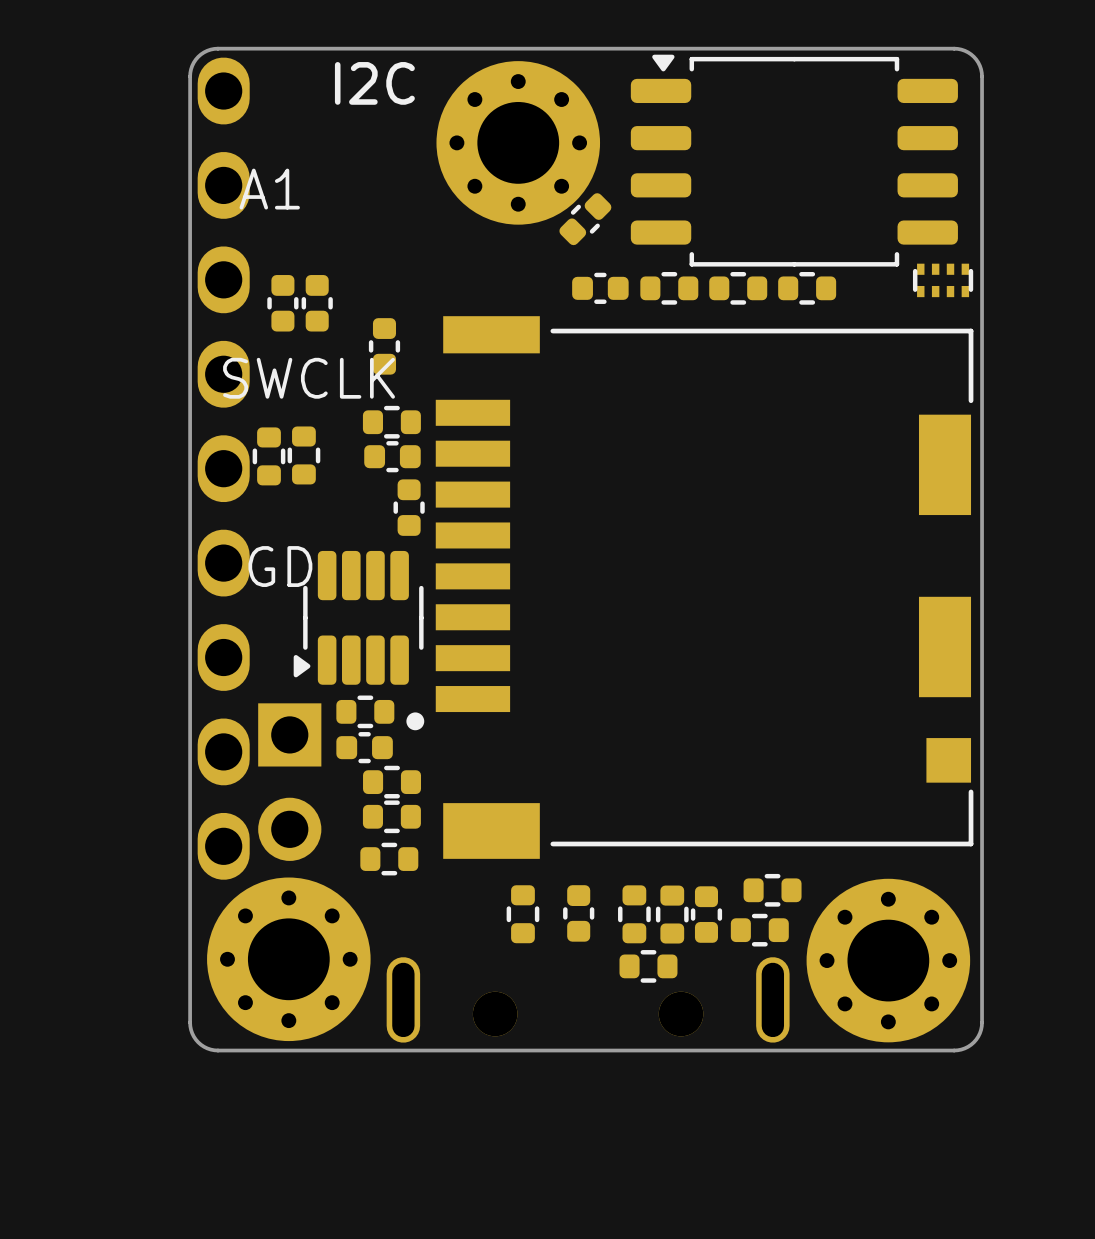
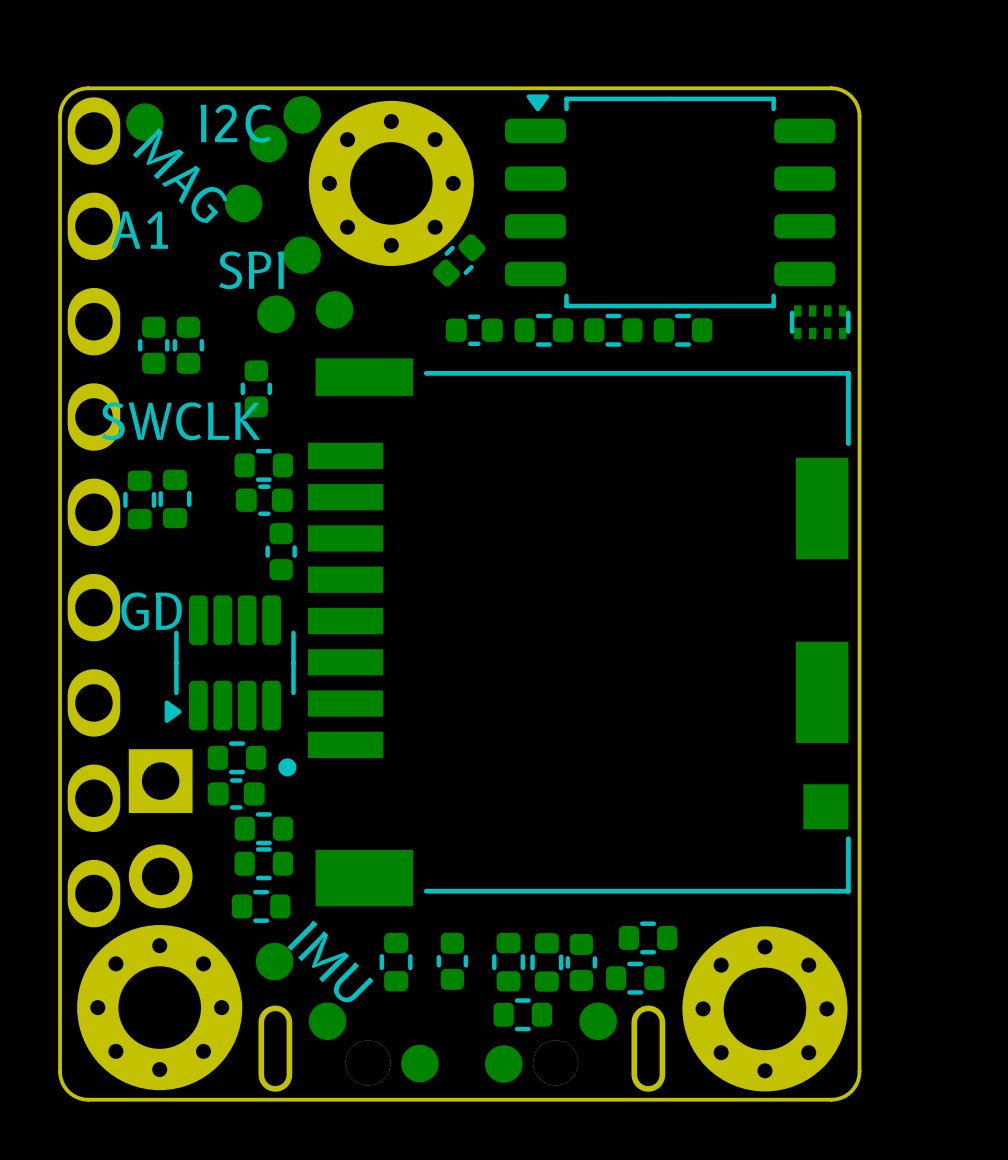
part: none -> (302, 114)
MAG: none -> (145, 122)
part: none -> (268, 143)
part: none -> (243, 203)
part: none -> (302, 255)
part: none -> (334, 309)
SPI: none -> (275, 314)
part: none -> (274, 961)
IMU: none -> (327, 1021)
part: none -> (598, 1021)
part: none -> (419, 1063)
part: none -> (503, 1064)

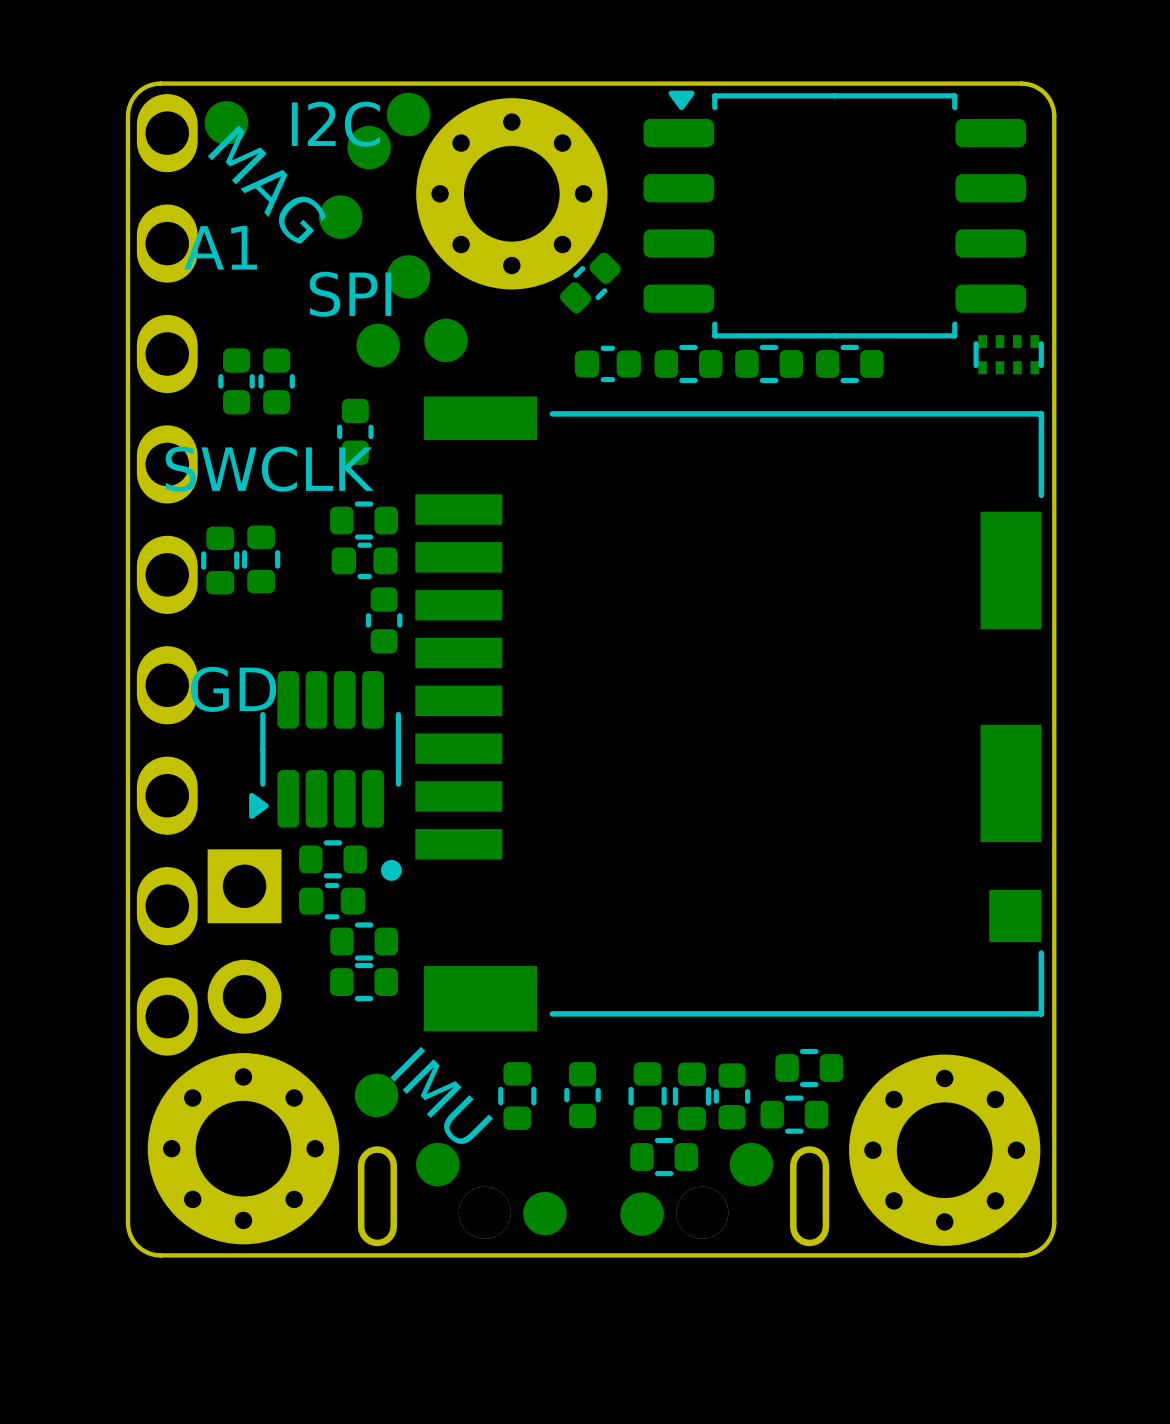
part: (261, 906) -> none

